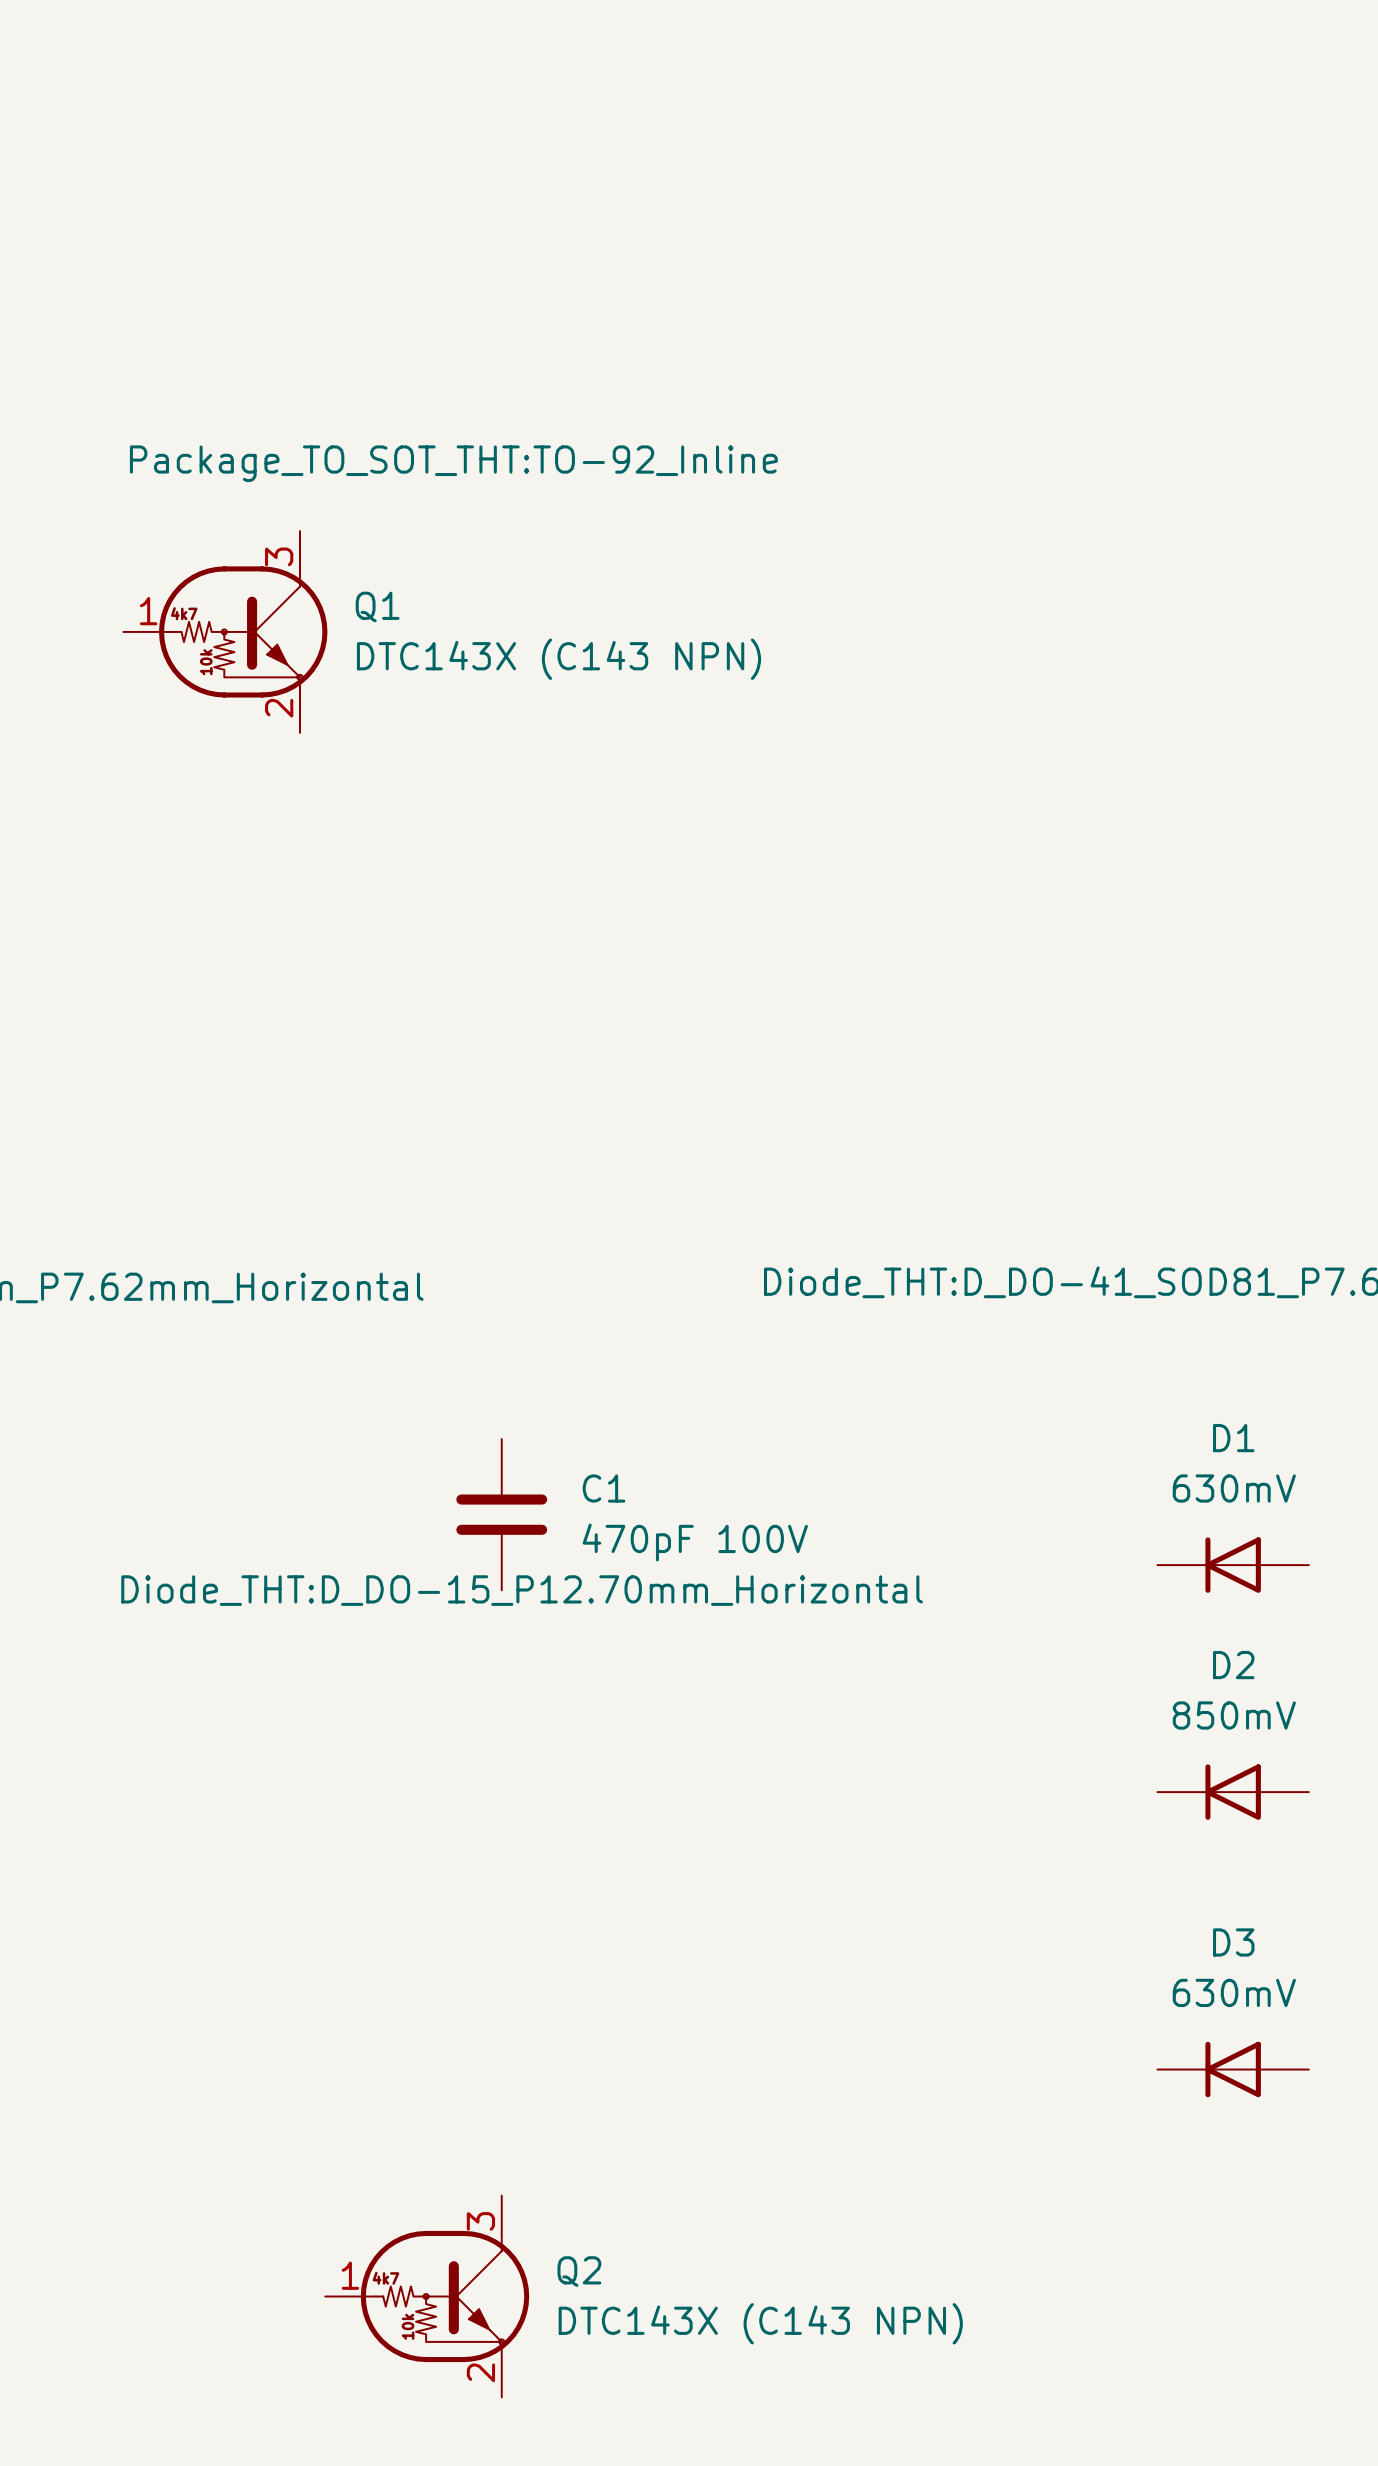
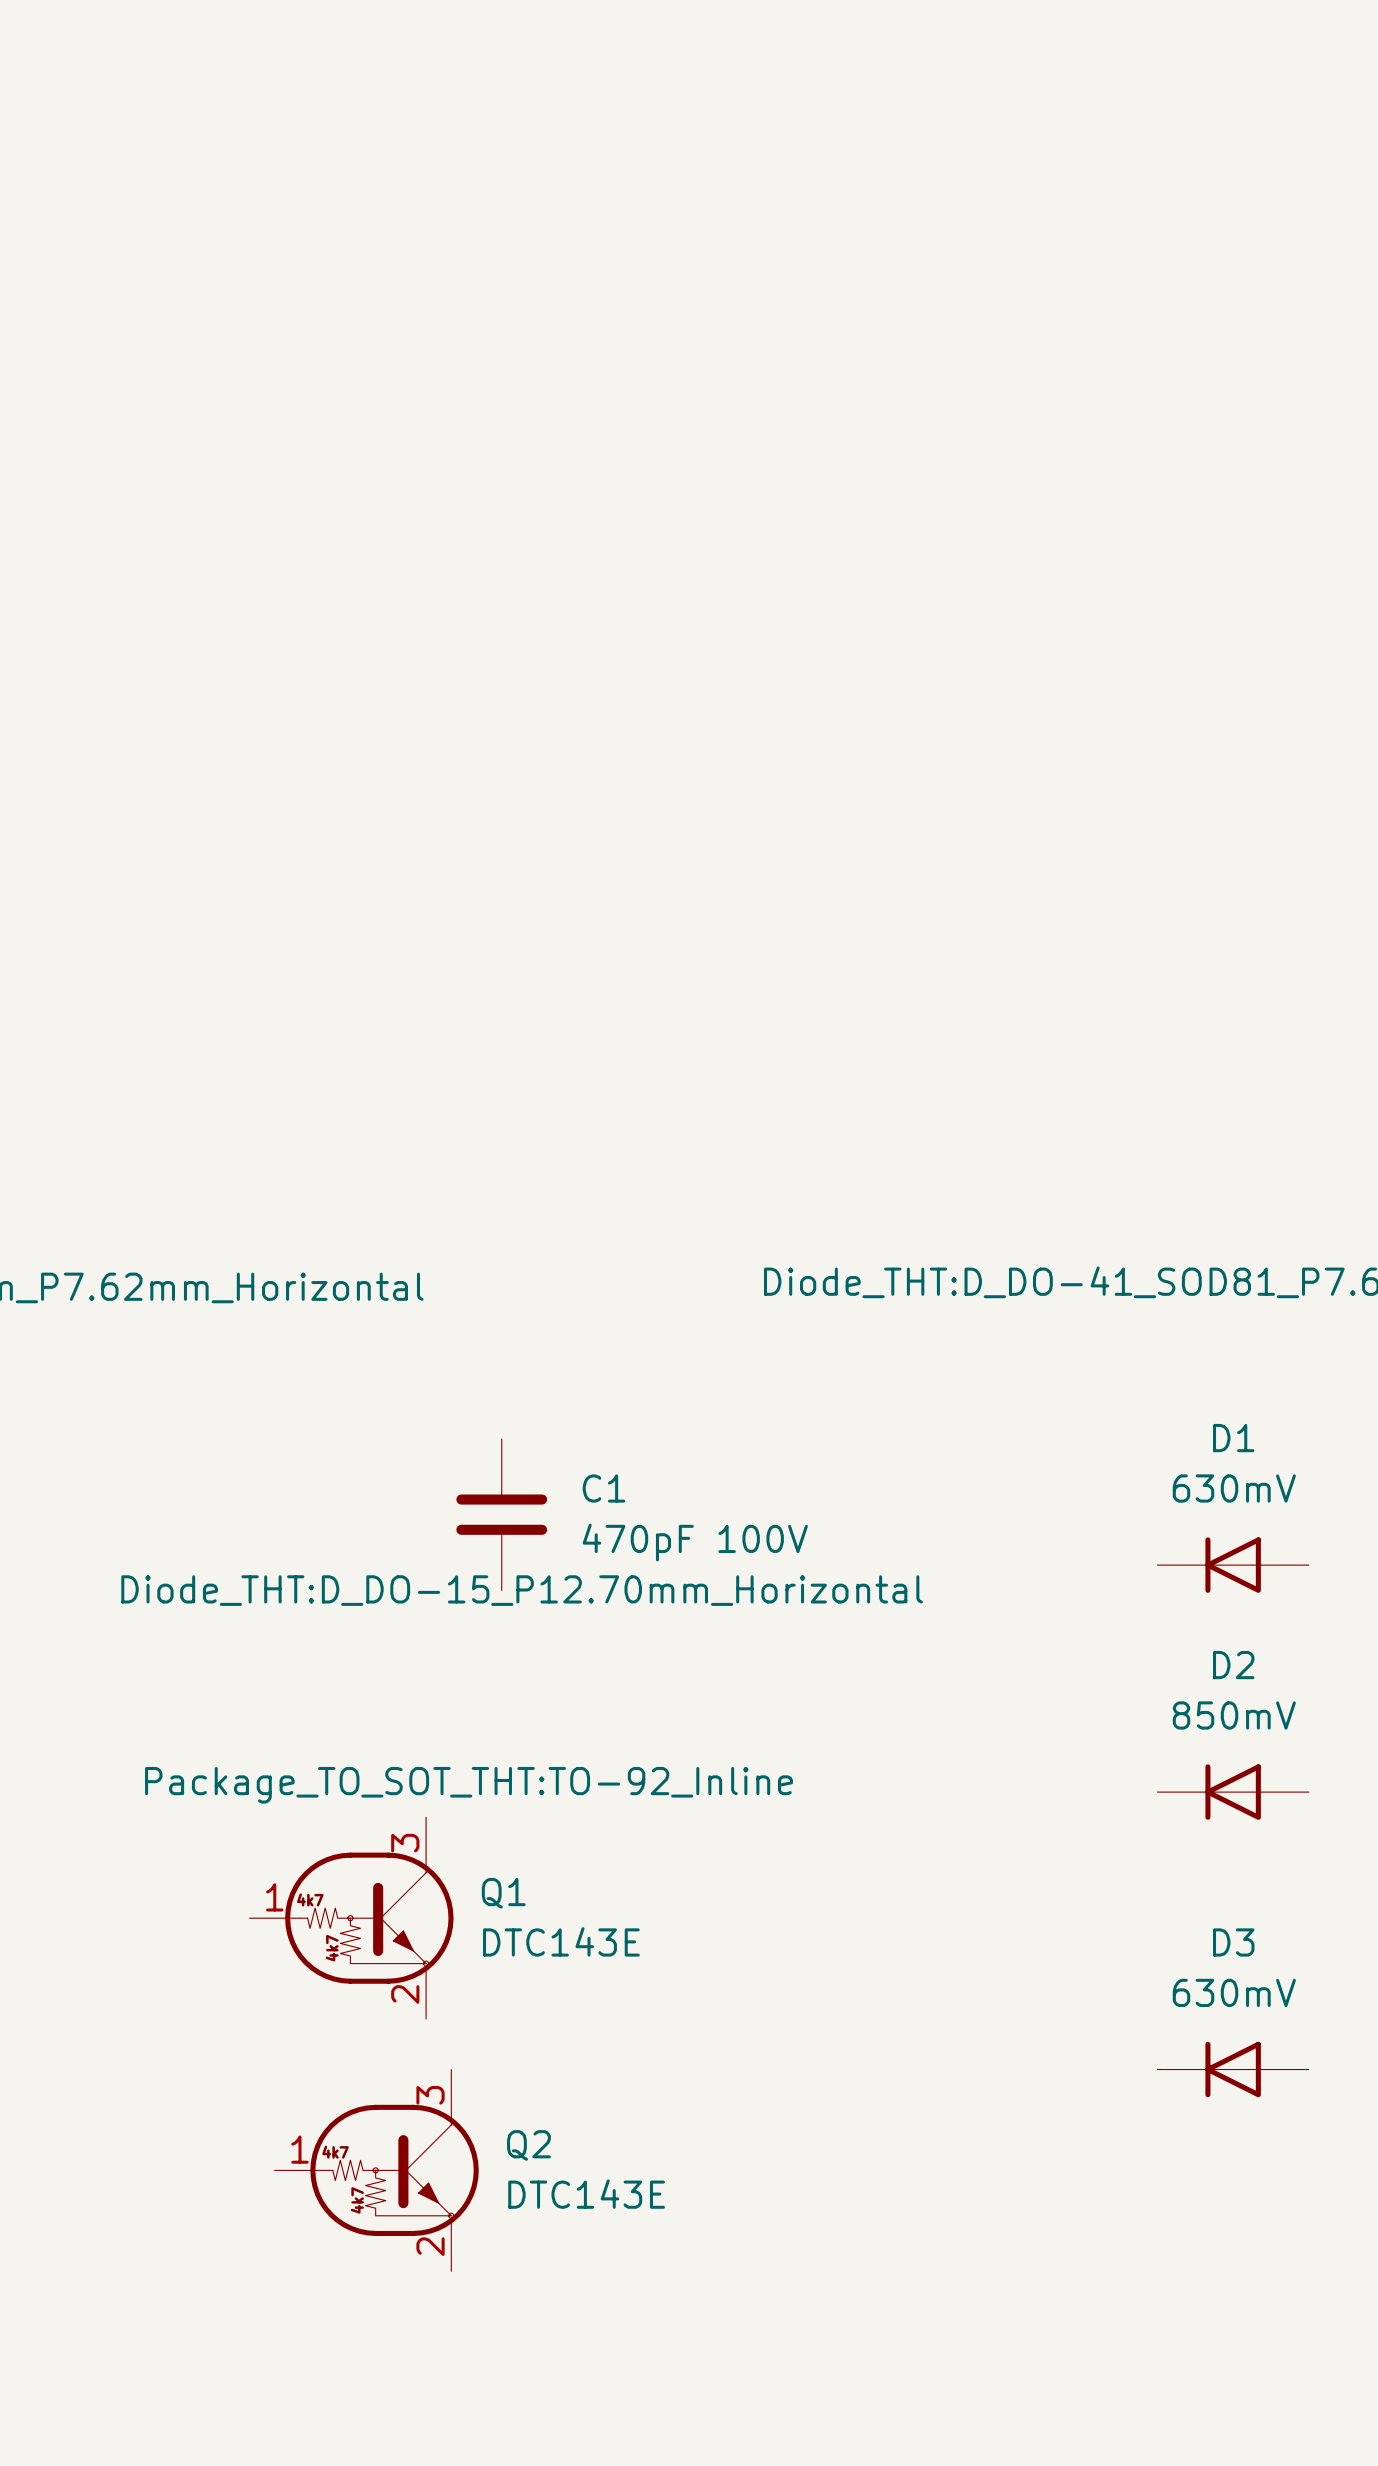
Q1 text position: Package_TO_SOT_THT:TO-92_Inline (453, 463) -> Package_TO_SOT_THT:TO-92_Inline (469, 1785)
Q1 position: (225, 631) -> (351, 1918)
Q1 value: DTC143X (C143 NPN) (558, 659) -> DTC143E (561, 1941)
Q1 text: 10k (206, 662) -> 4k7 (332, 1948)
Q2 position: (427, 2296) -> (376, 2170)
Q2 value: DTC143X (C143 NPN) (760, 2323) -> DTC143E (586, 2194)
Q2 text: 10k (408, 2326) -> 4k7 (357, 2200)

